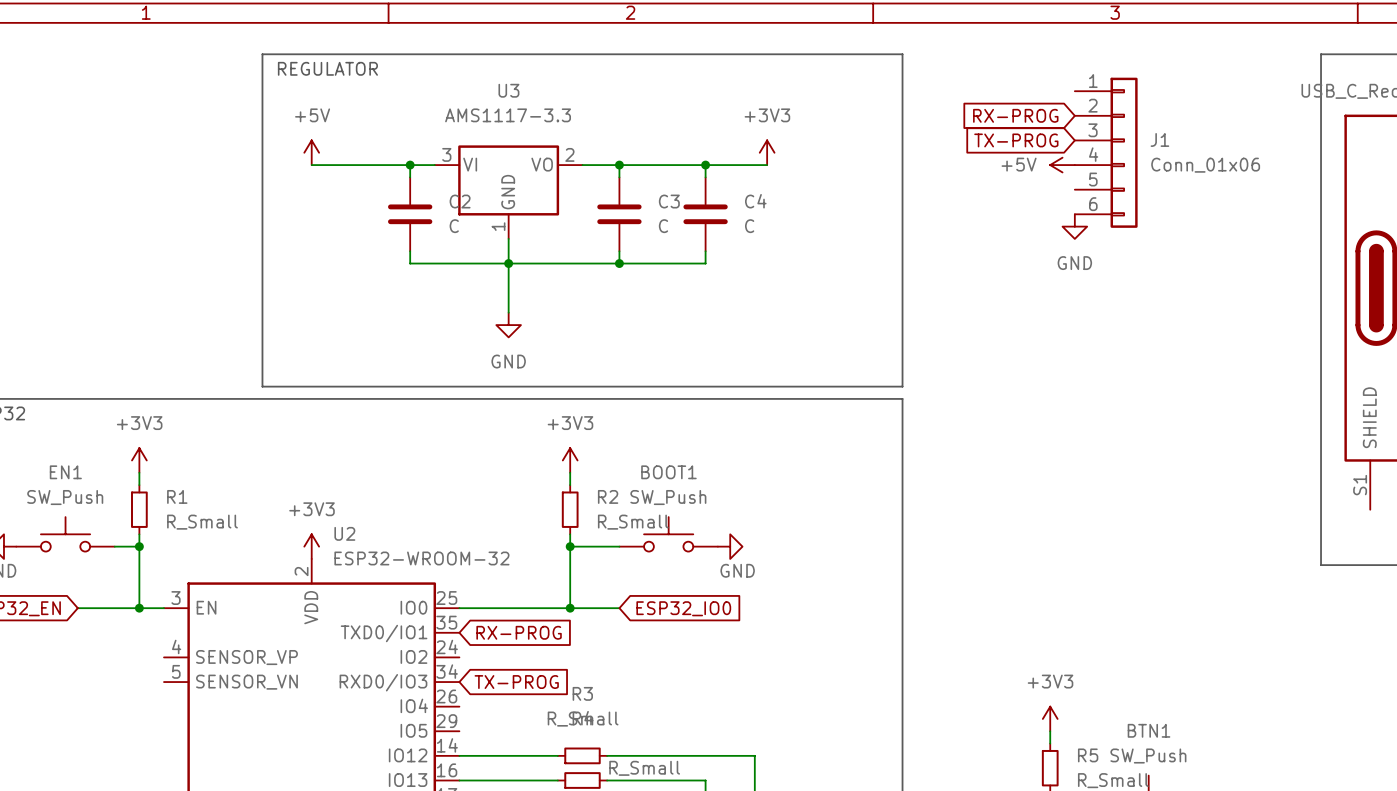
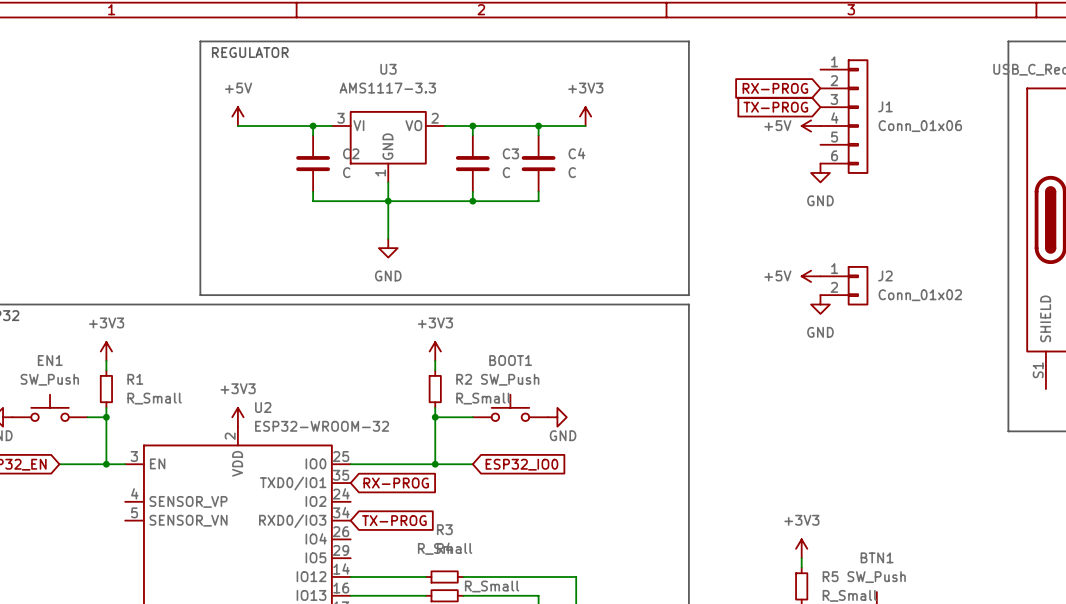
power symbol: none -> +5V (811, 276)
J2: none -> Conn_01x02 (844, 285)
power symbol: none -> GND (820, 304)

